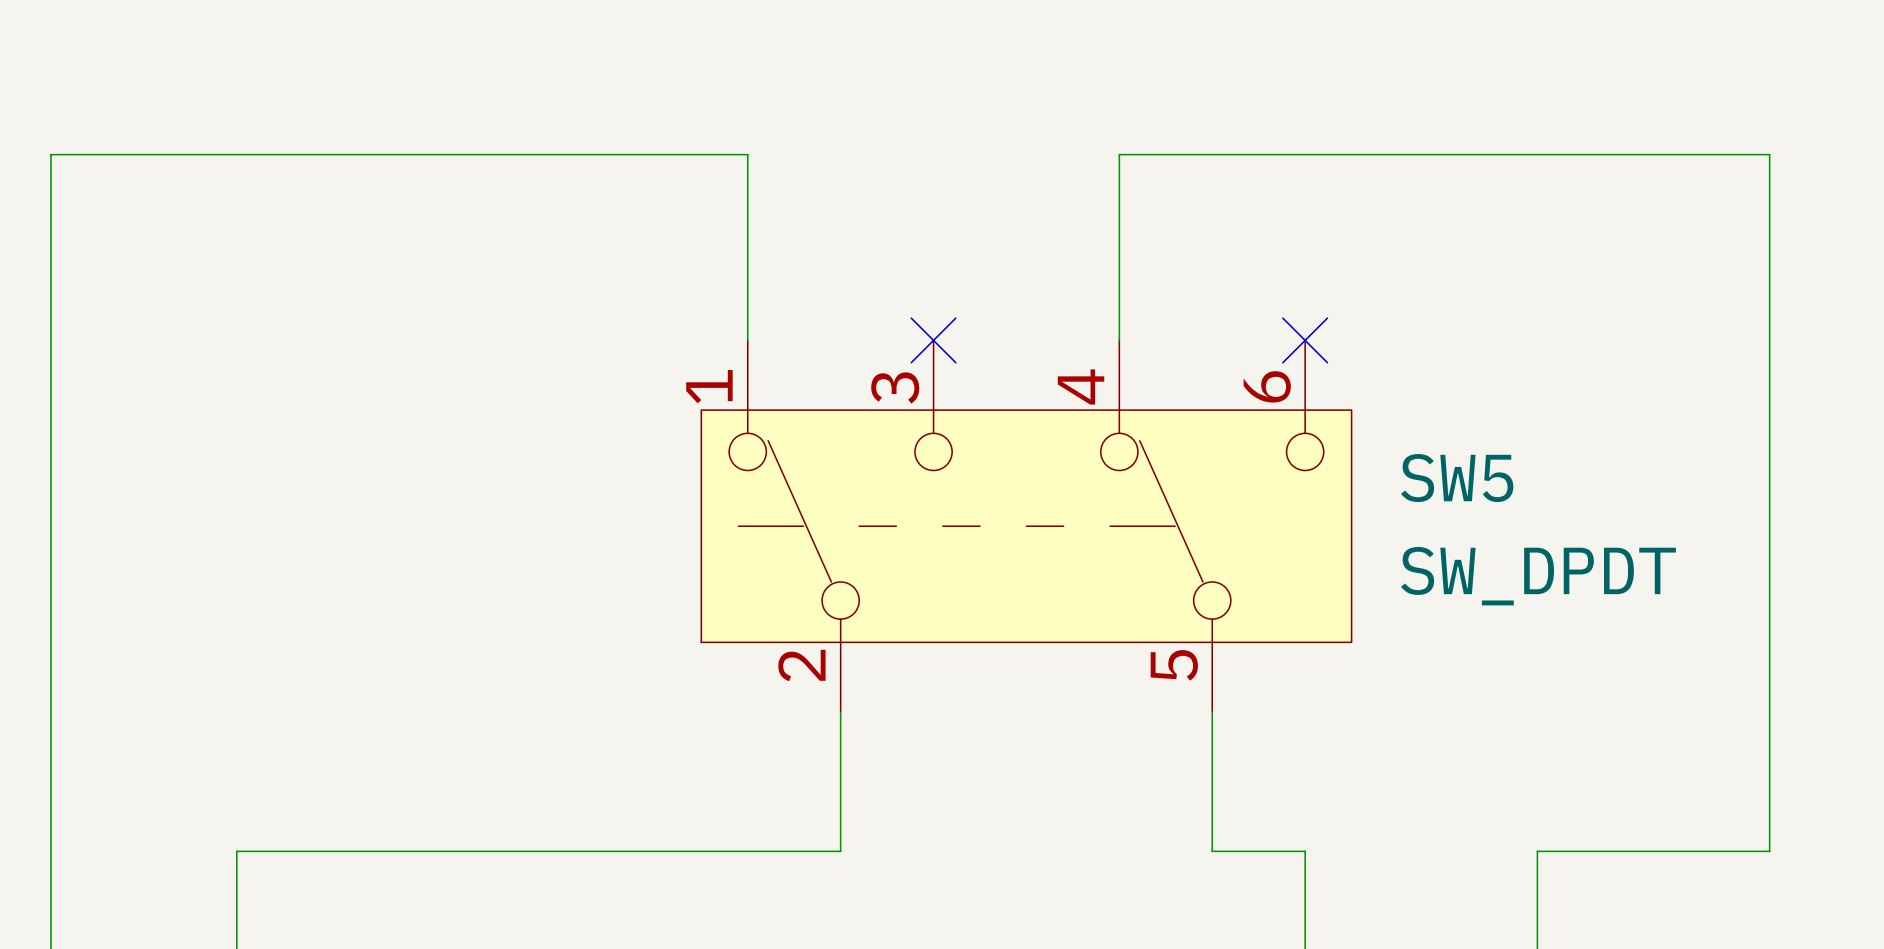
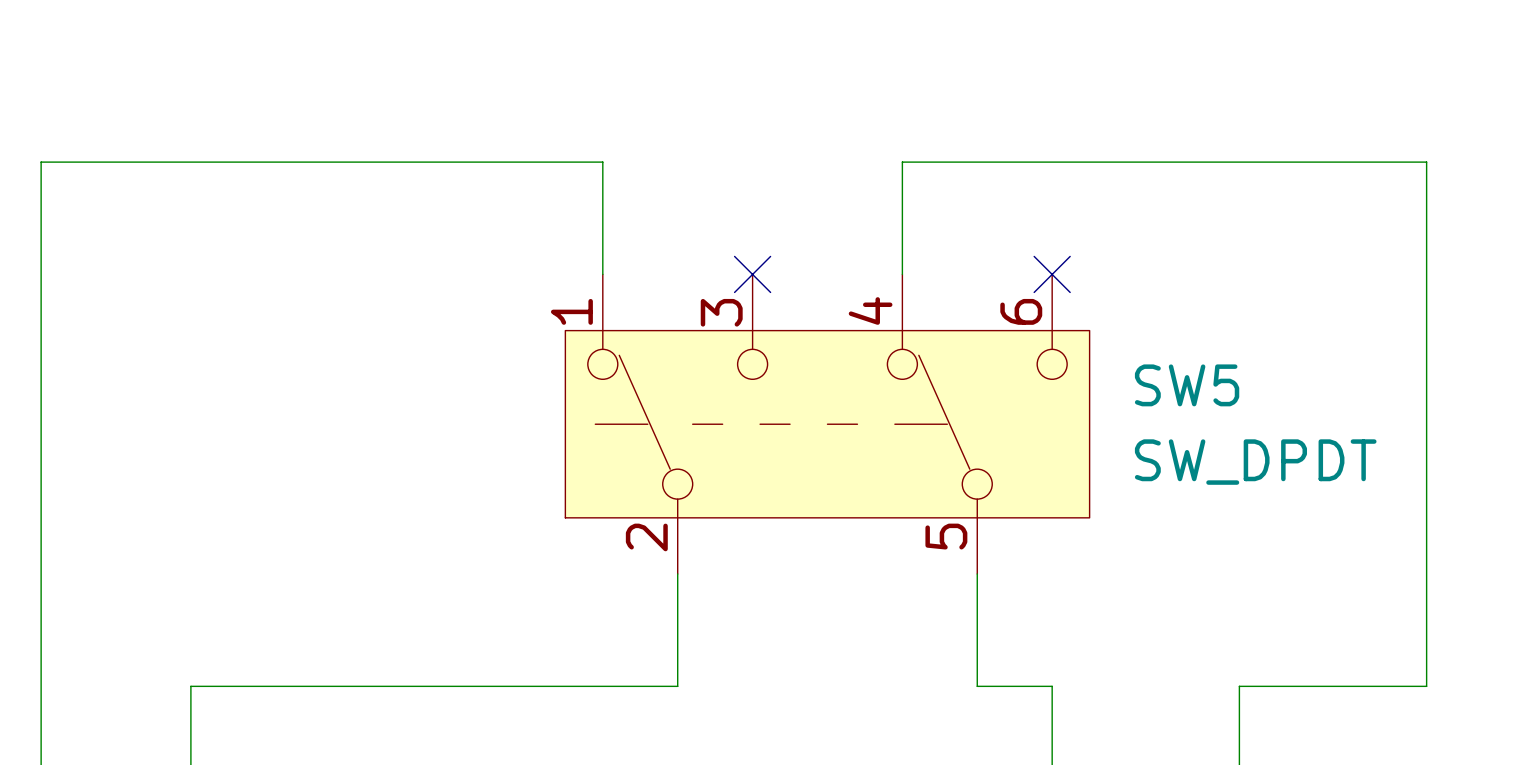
wire: (51, 201) (51, 154) (747, 154) (747, 201) -> (41, 162) (602, 162)
wire: (1119, 201) (1119, 154) (1769, 154) (1769, 201) -> (902, 162) (1426, 162)

